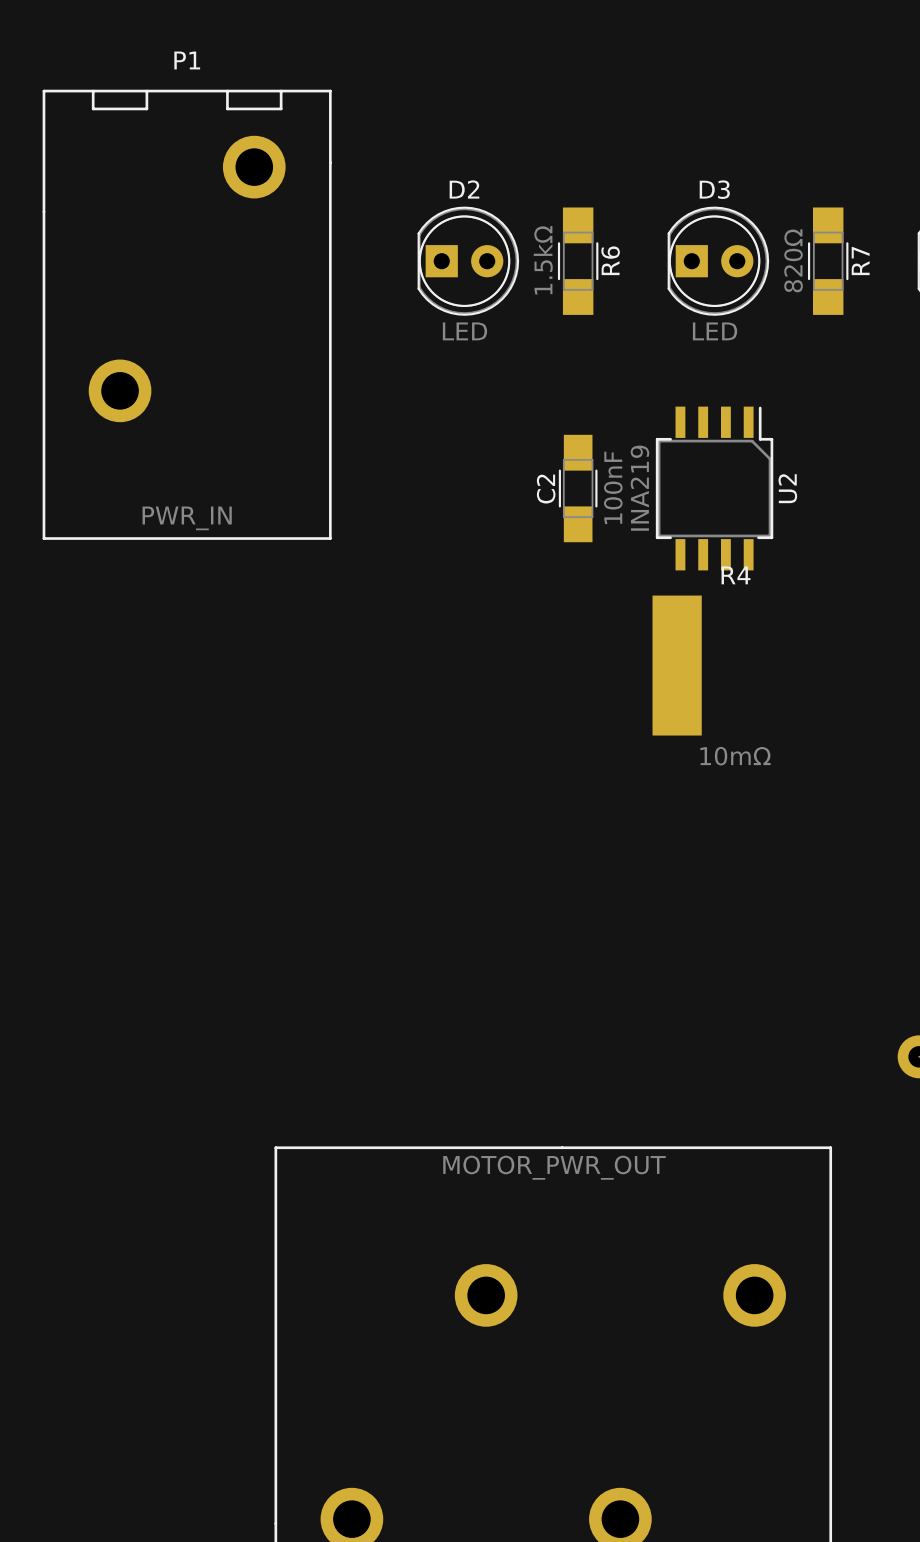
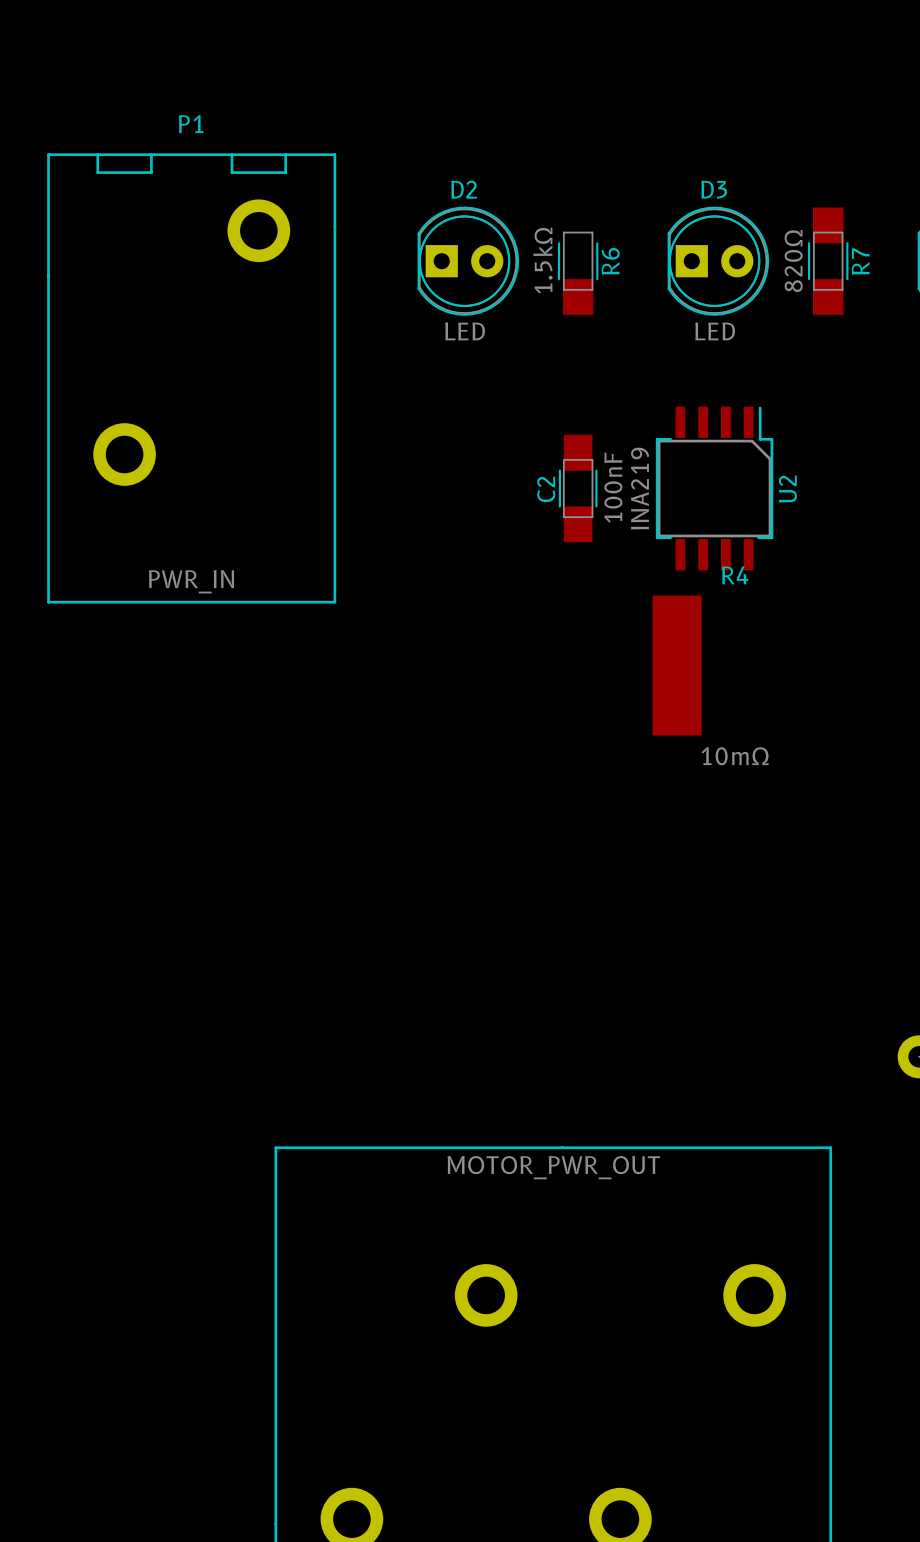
R6 footprint: [557, 207, 599, 315] -> [557, 231, 599, 315]
P1 position: (187, 314) -> (191, 378)

